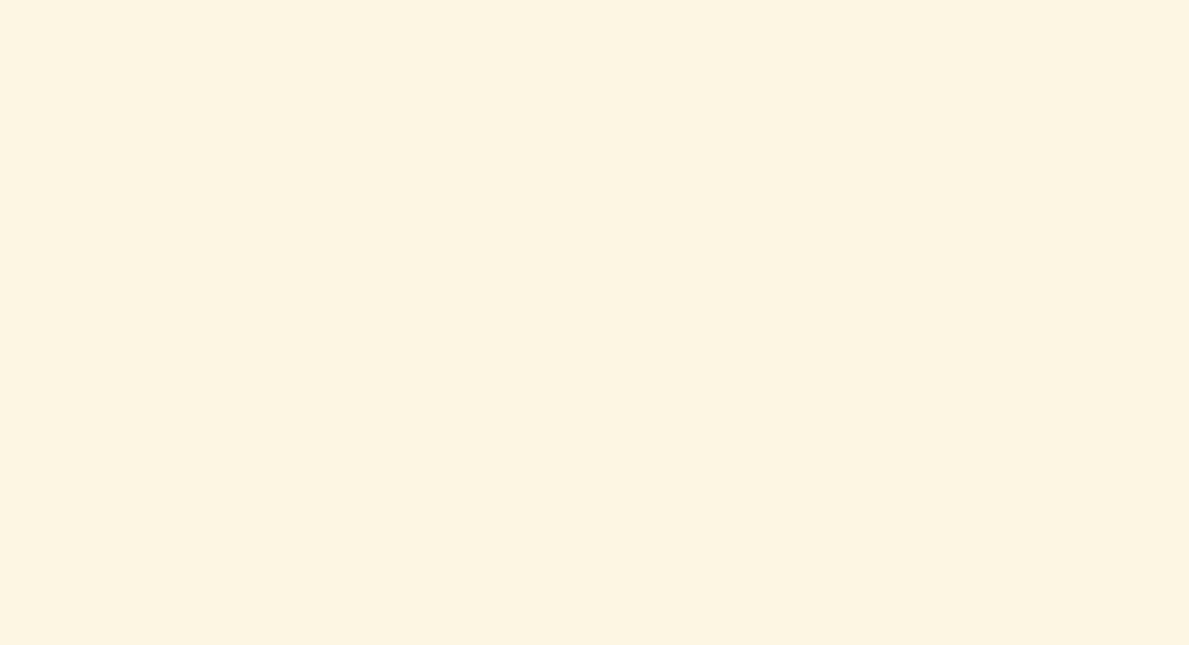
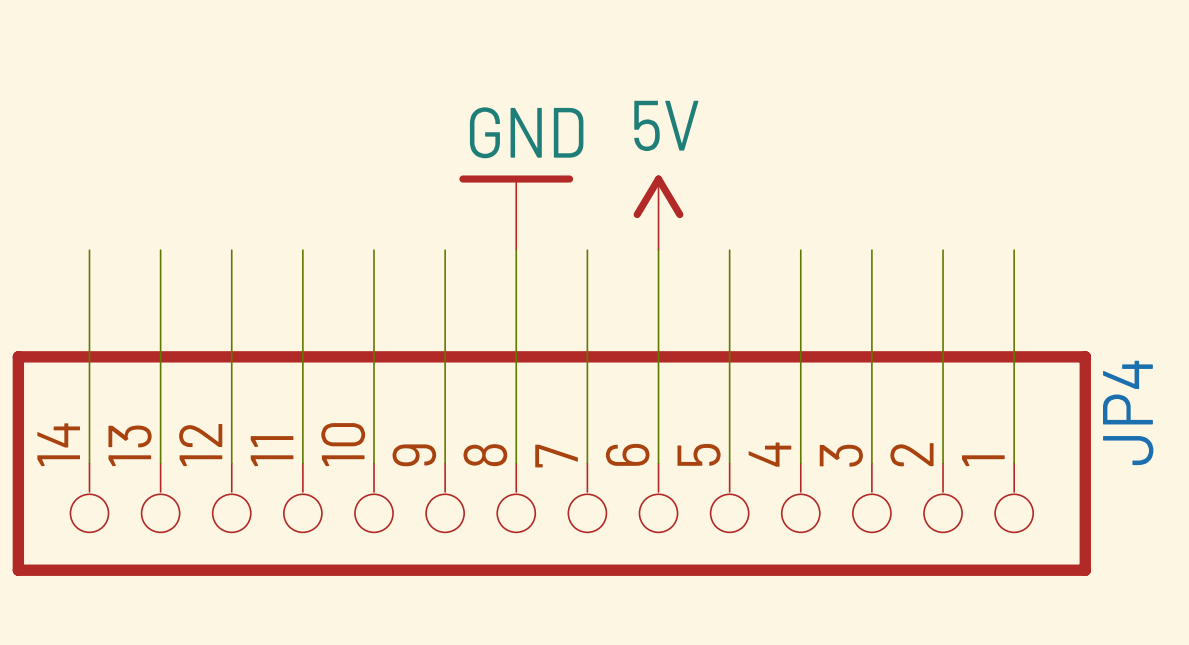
power symbol: none -> GND (516, 212)
power symbol: none -> 5V (658, 212)
wire: none -> (89, 250) (89, 463)
wire: none -> (160, 250) (160, 463)
wire: none -> (231, 250) (231, 463)
wire: none -> (302, 250) (302, 463)
wire: none -> (374, 250) (374, 463)
wire: none -> (445, 250) (445, 463)
wire: none -> (516, 250) (516, 463)
wire: none -> (587, 250) (587, 463)
wire: none -> (658, 250) (658, 463)
wire: none -> (729, 250) (729, 463)
wire: none -> (800, 250) (800, 463)
wire: none -> (871, 250) (871, 463)
wire: none -> (943, 250) (943, 463)
wire: none -> (1014, 250) (1014, 463)
JP4: none -> (551, 463)

